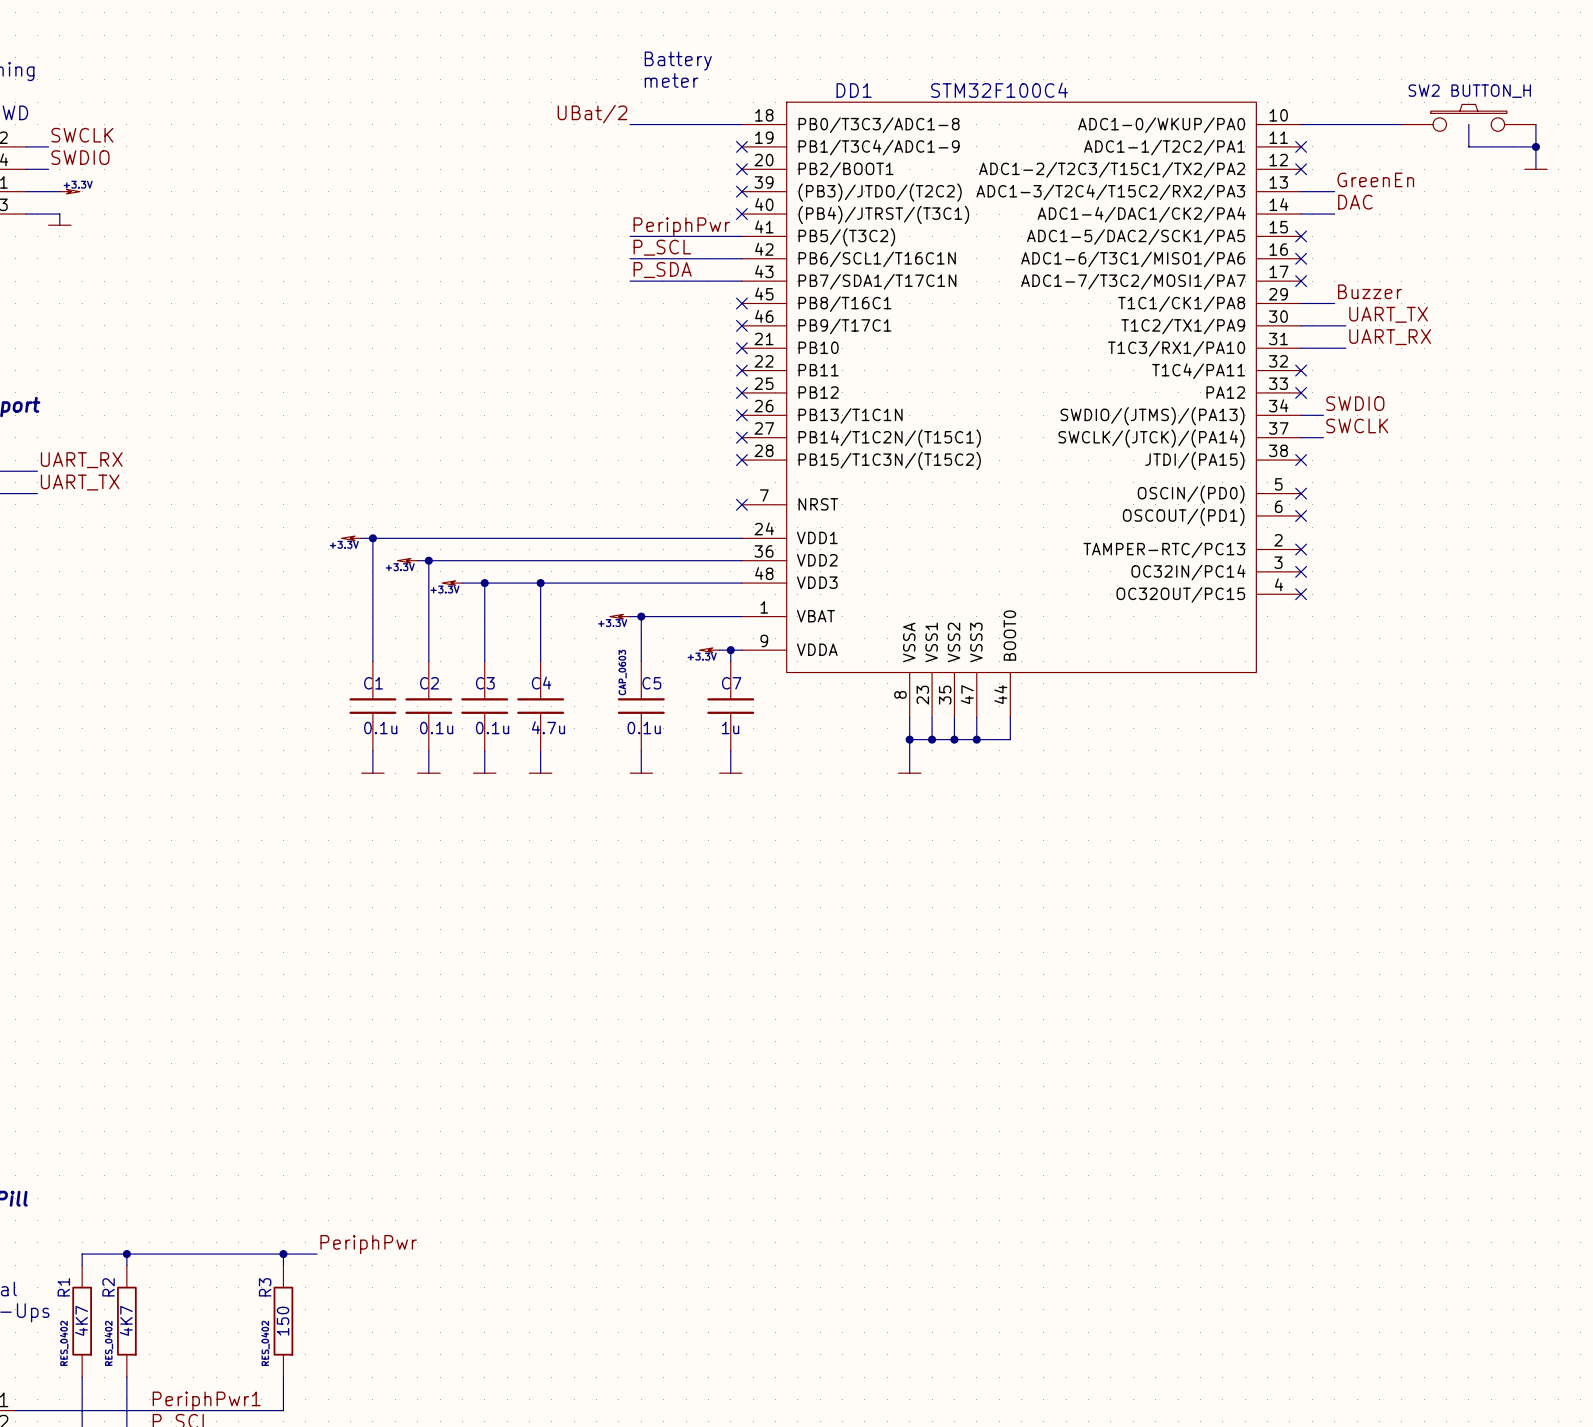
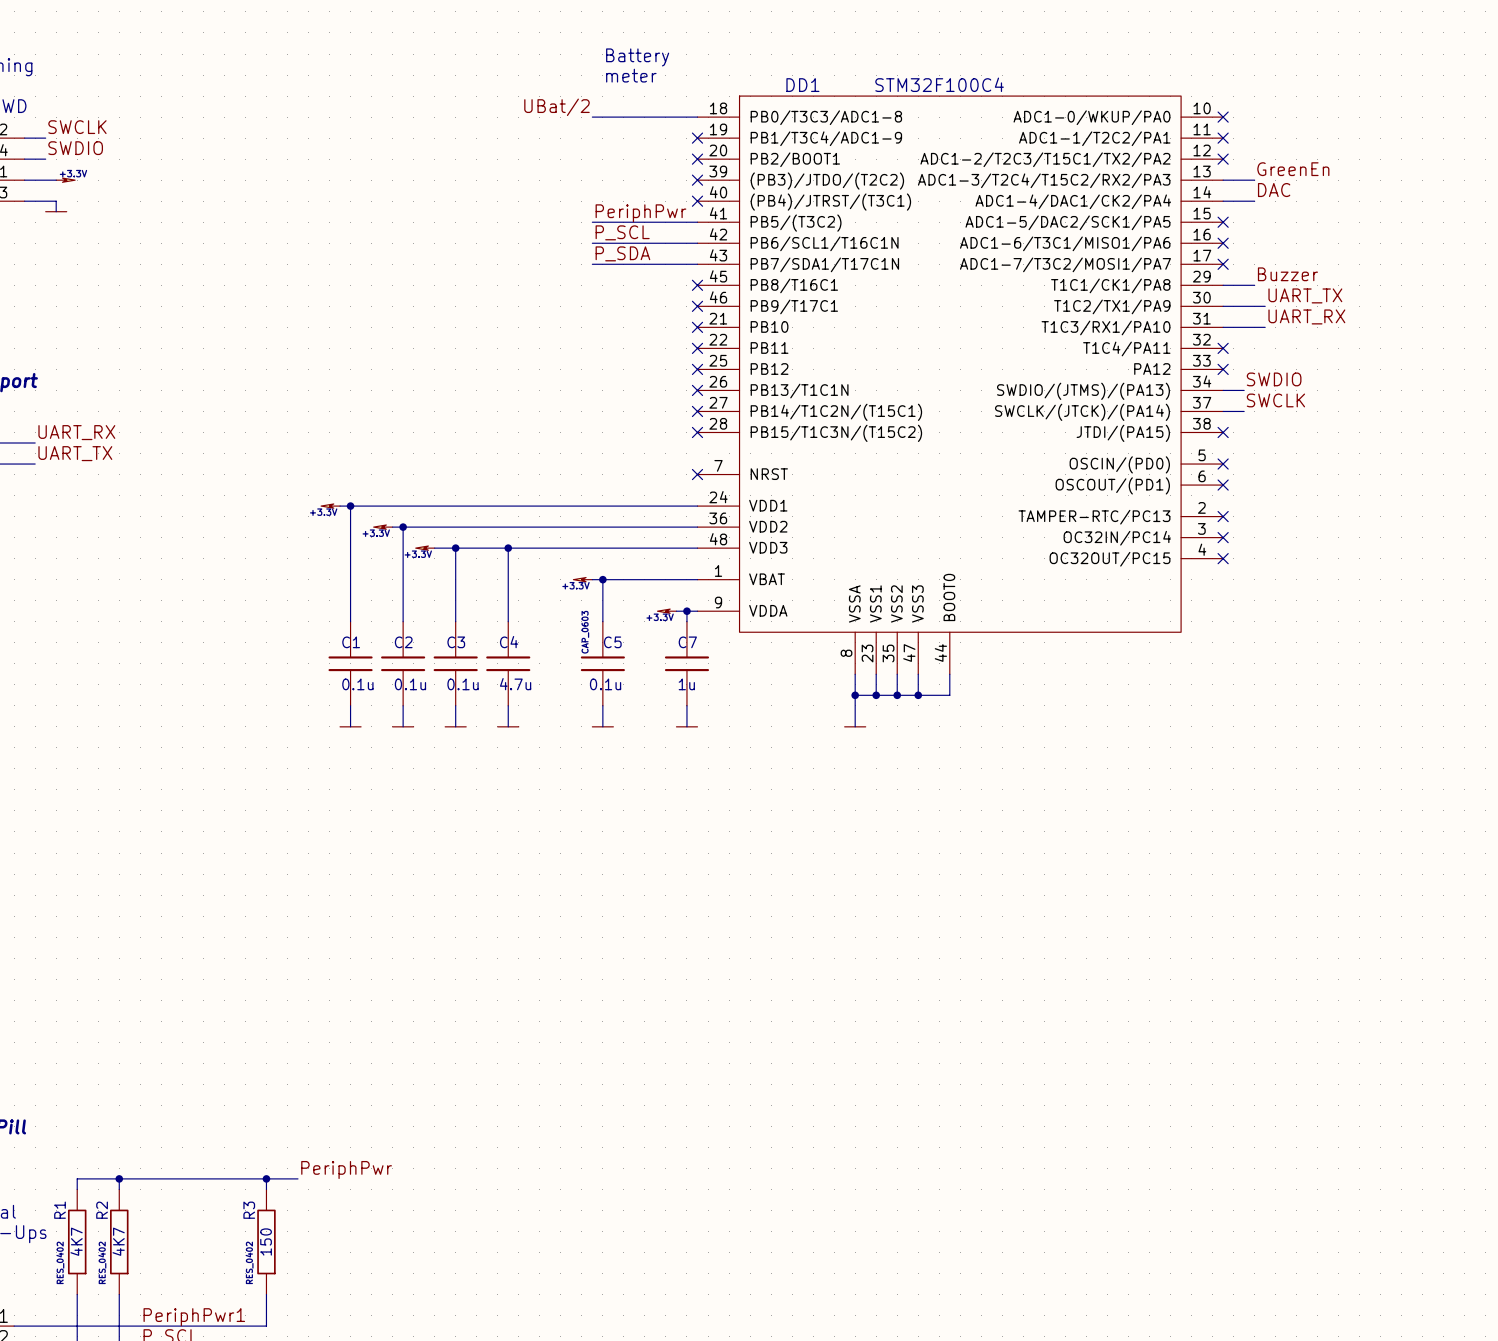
SW2: BUTTON_H (1468, 117) -> none
wire: (1301, 124) (1401, 124) -> none
no-connect mark: none -> (1223, 117)
wire: (1468, 124) (1468, 146) (1535, 146) -> none
wire: (1535, 124) (1535, 169) -> none
junction: (1535, 146) -> none
power symbol: (1535, 169) -> none

